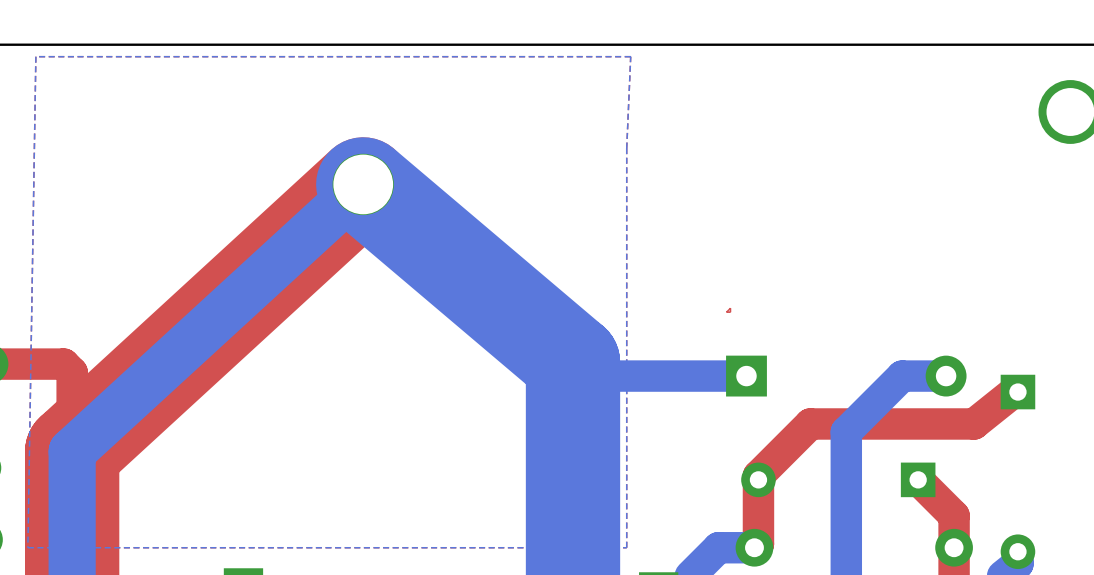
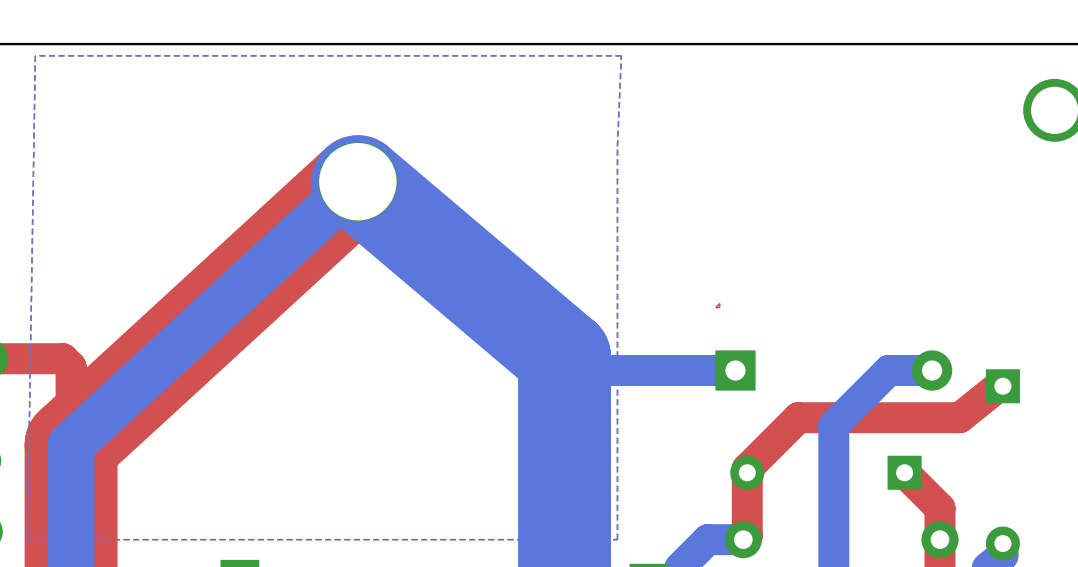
part footprint: [332, 153, 394, 216] -> [318, 142, 398, 222]

